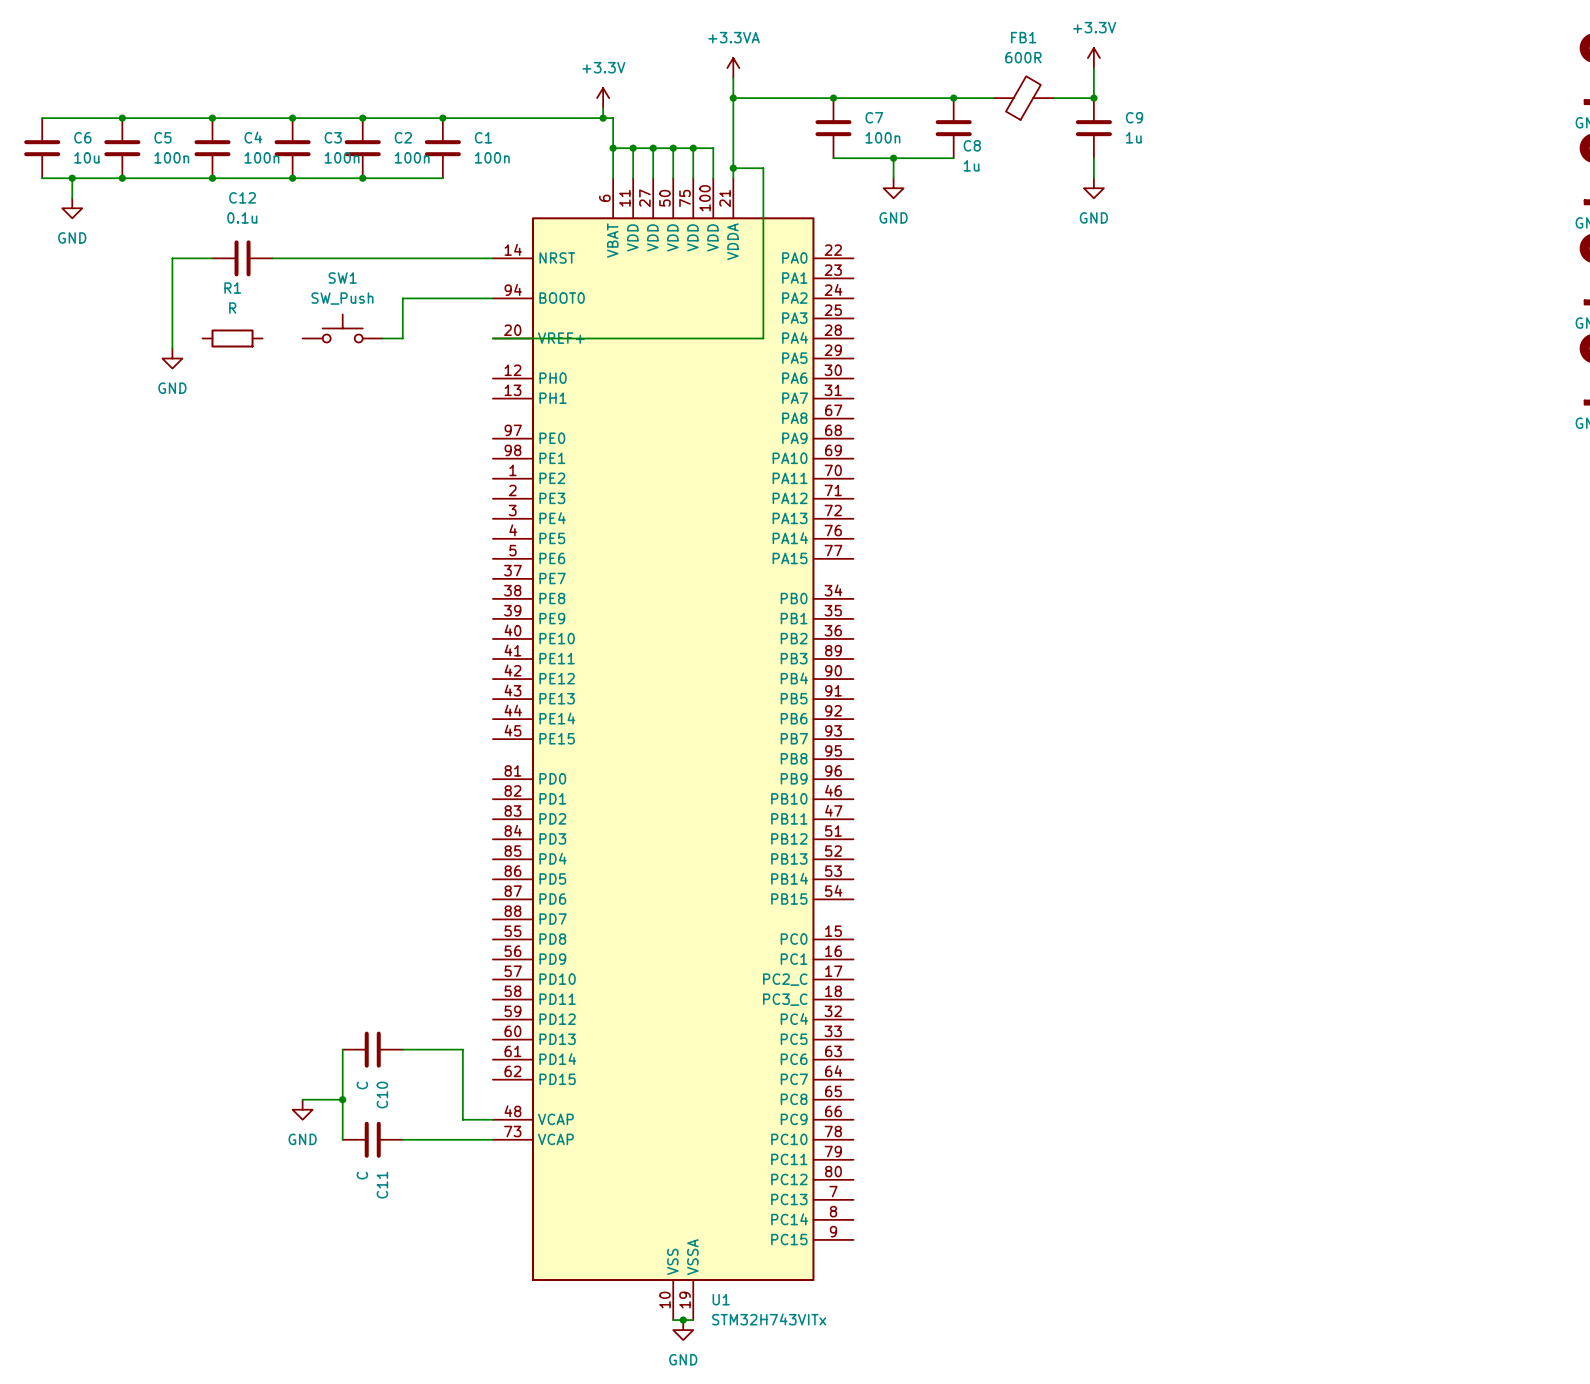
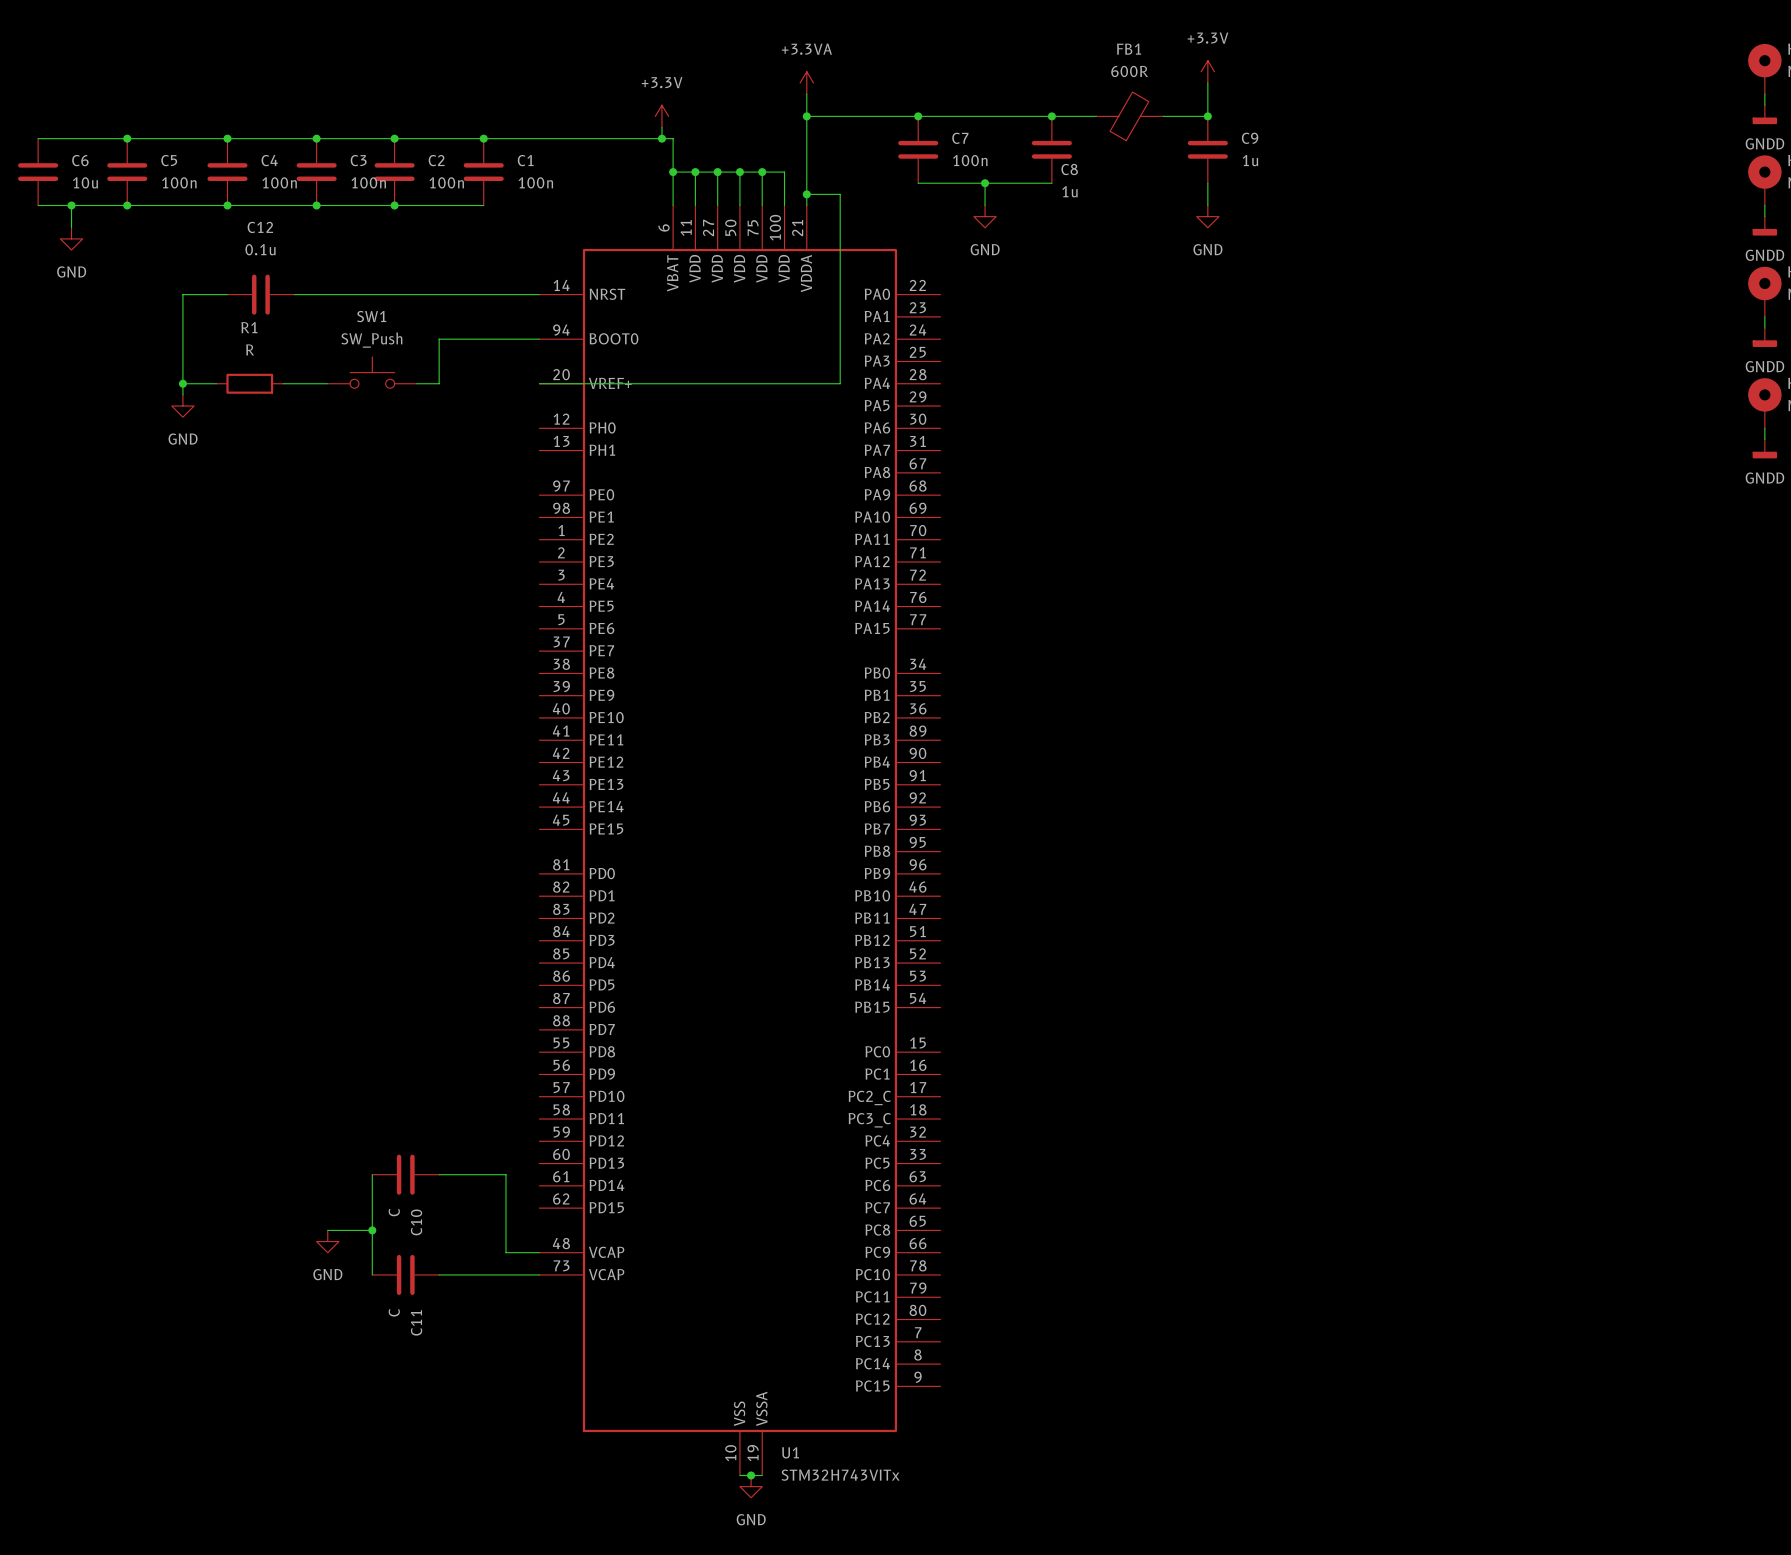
wire: none -> (182, 383) (216, 383)
junction: none -> (182, 383)
wire: none -> (283, 383) (327, 383)

